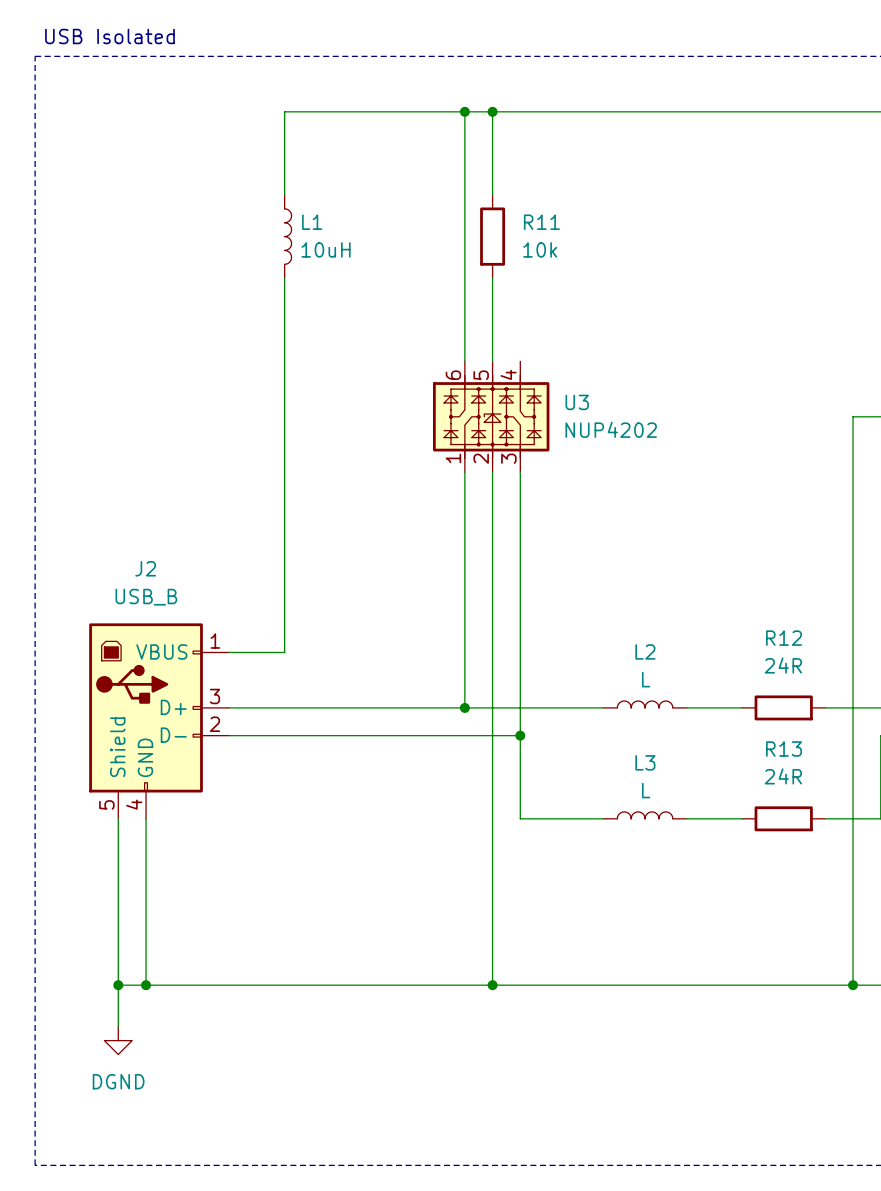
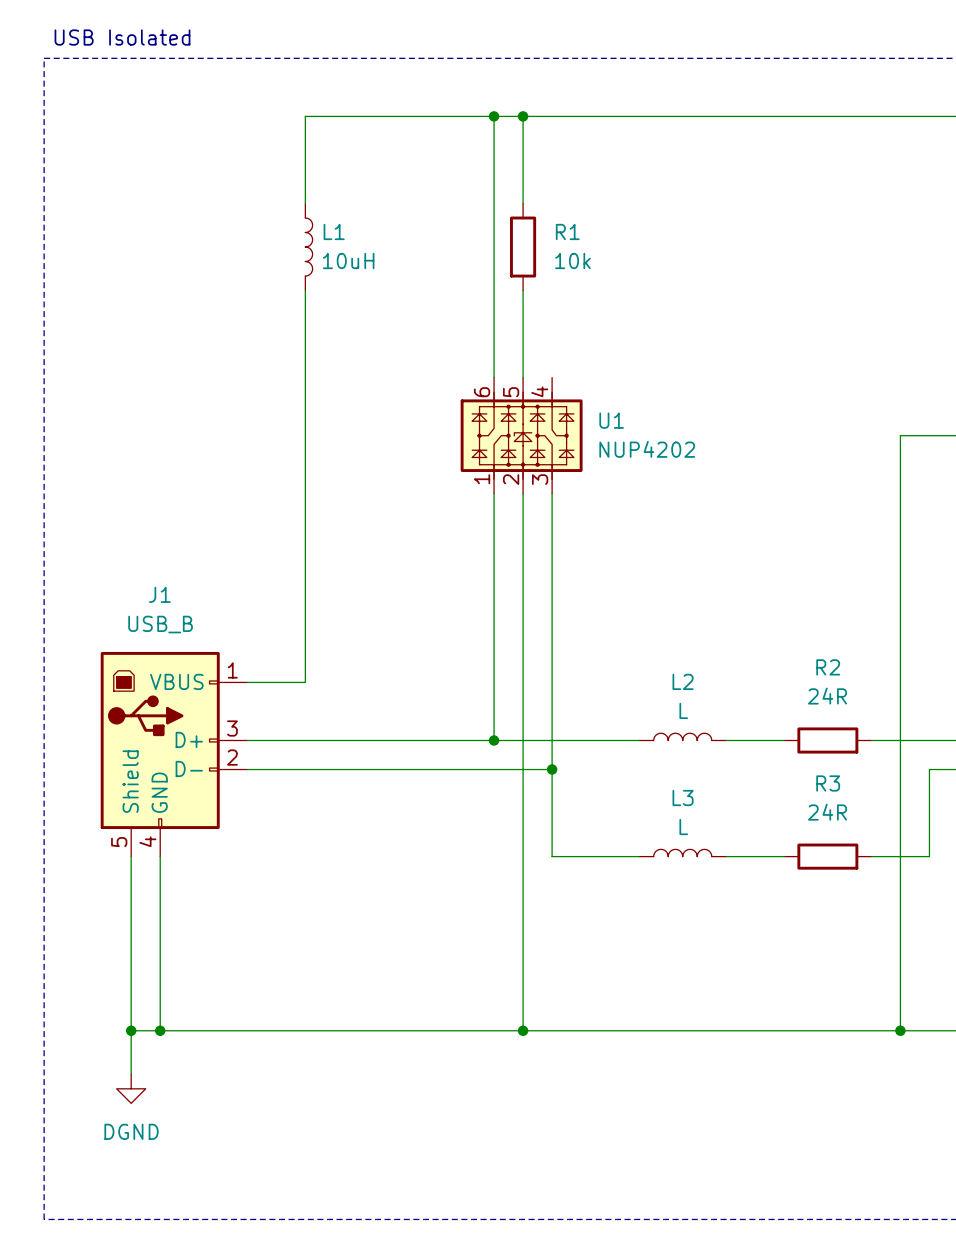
R11 name: R11 (541, 222) -> R1 (567, 231)
U3 name: U3 (577, 402) -> U1 (611, 420)
J2 name: J2 (145, 568) -> J1 (159, 594)
R12 name: R12 (784, 638) -> R2 (828, 667)
R13 name: R13 (784, 748) -> R3 (828, 783)

